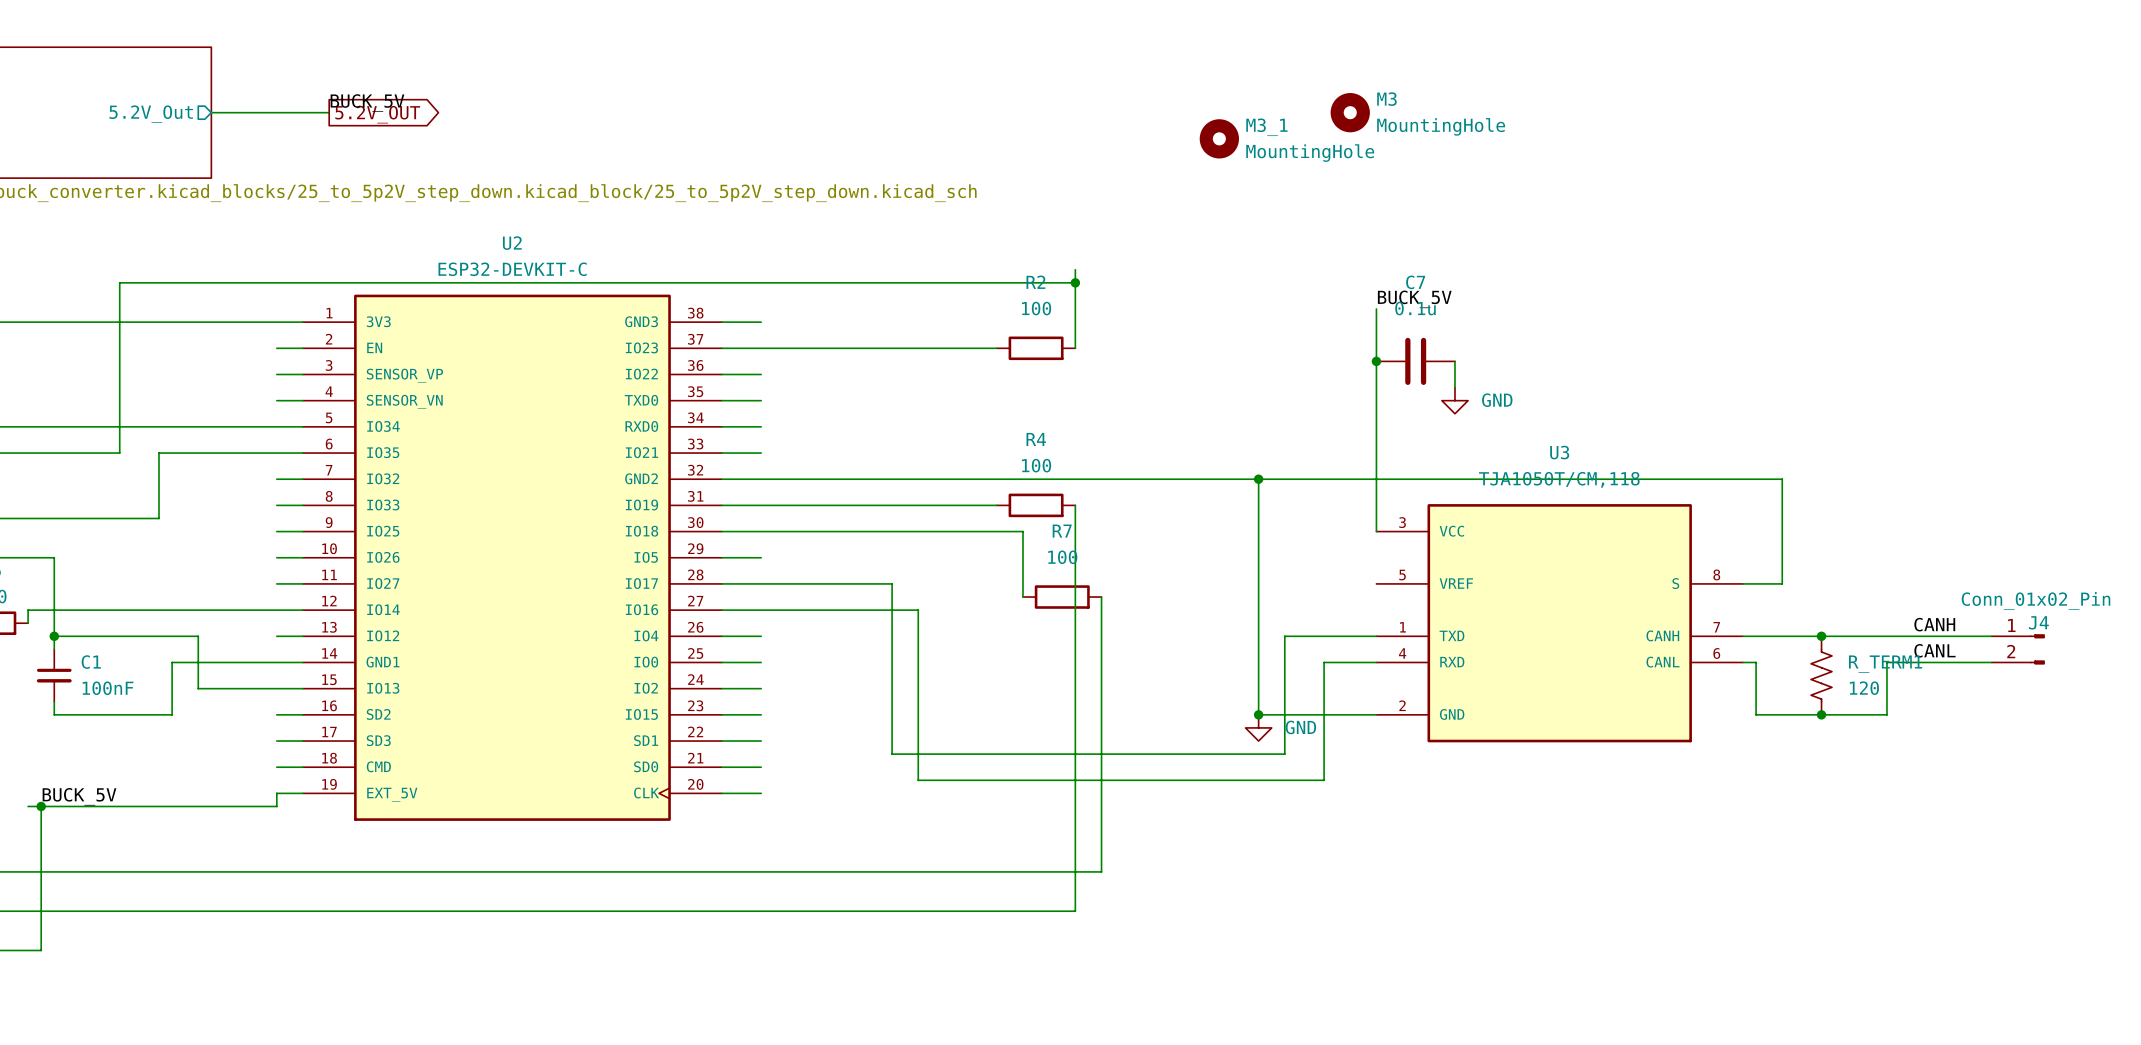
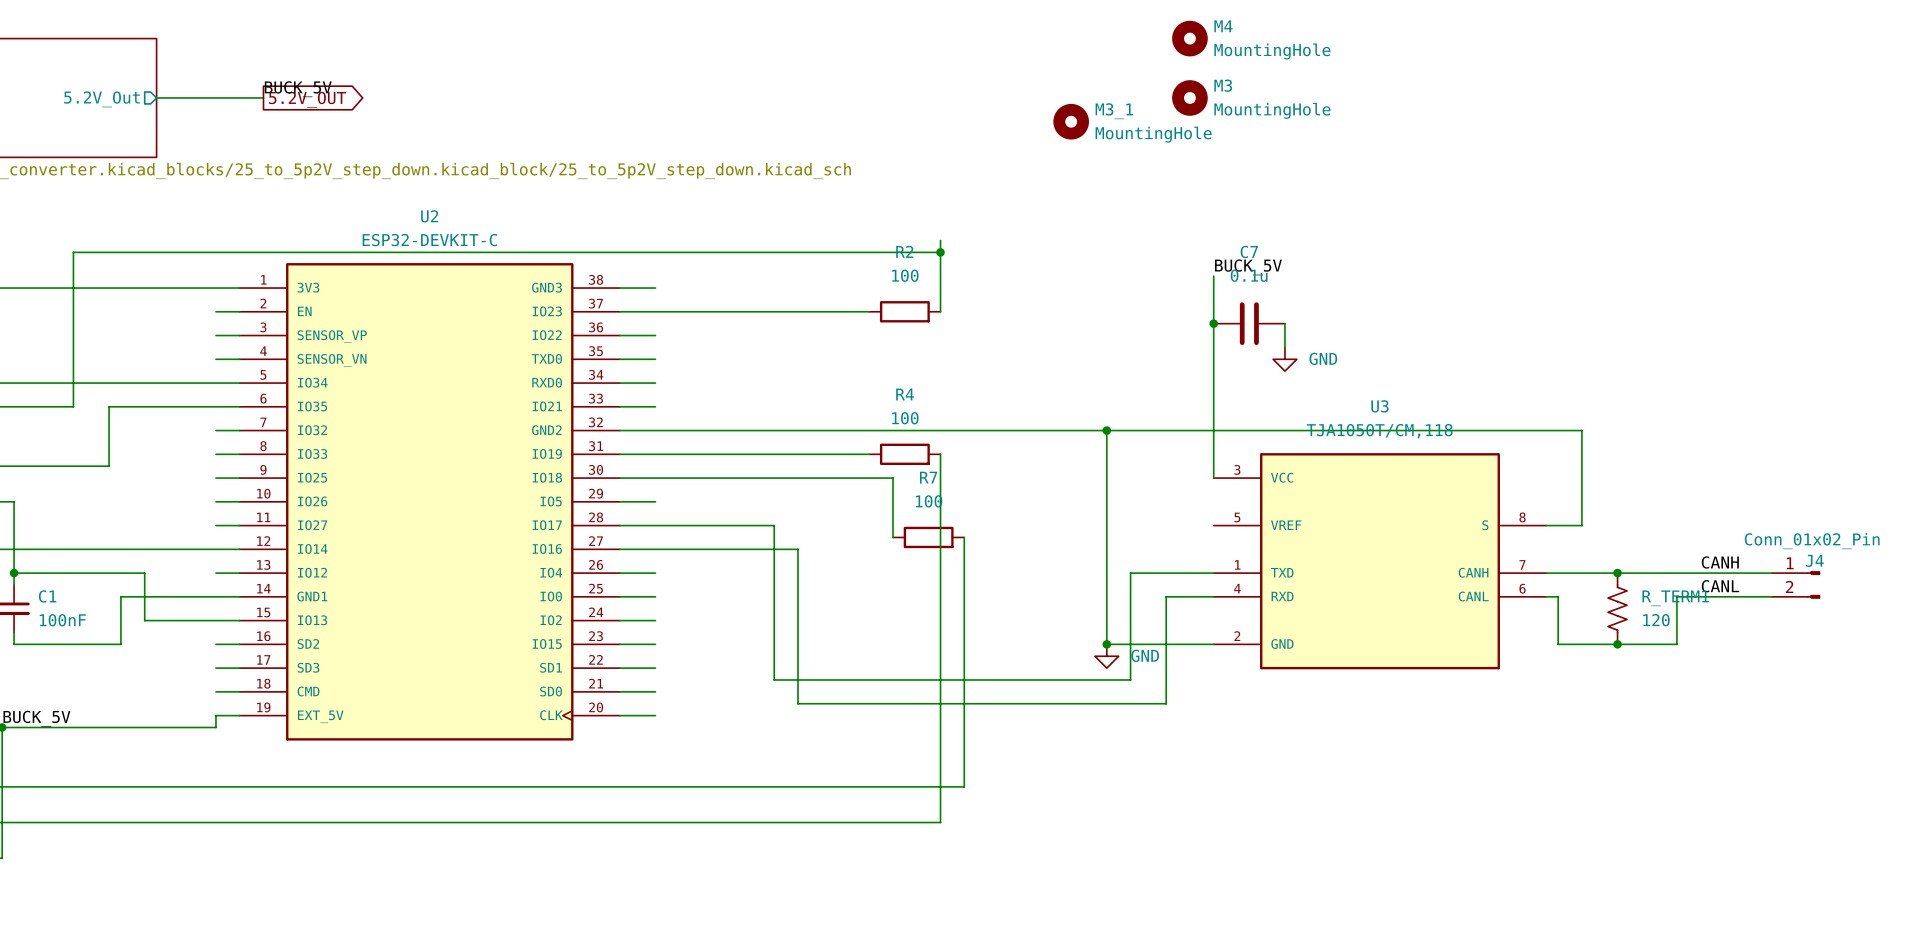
M4: none -> MountingHole (1189, 38)

